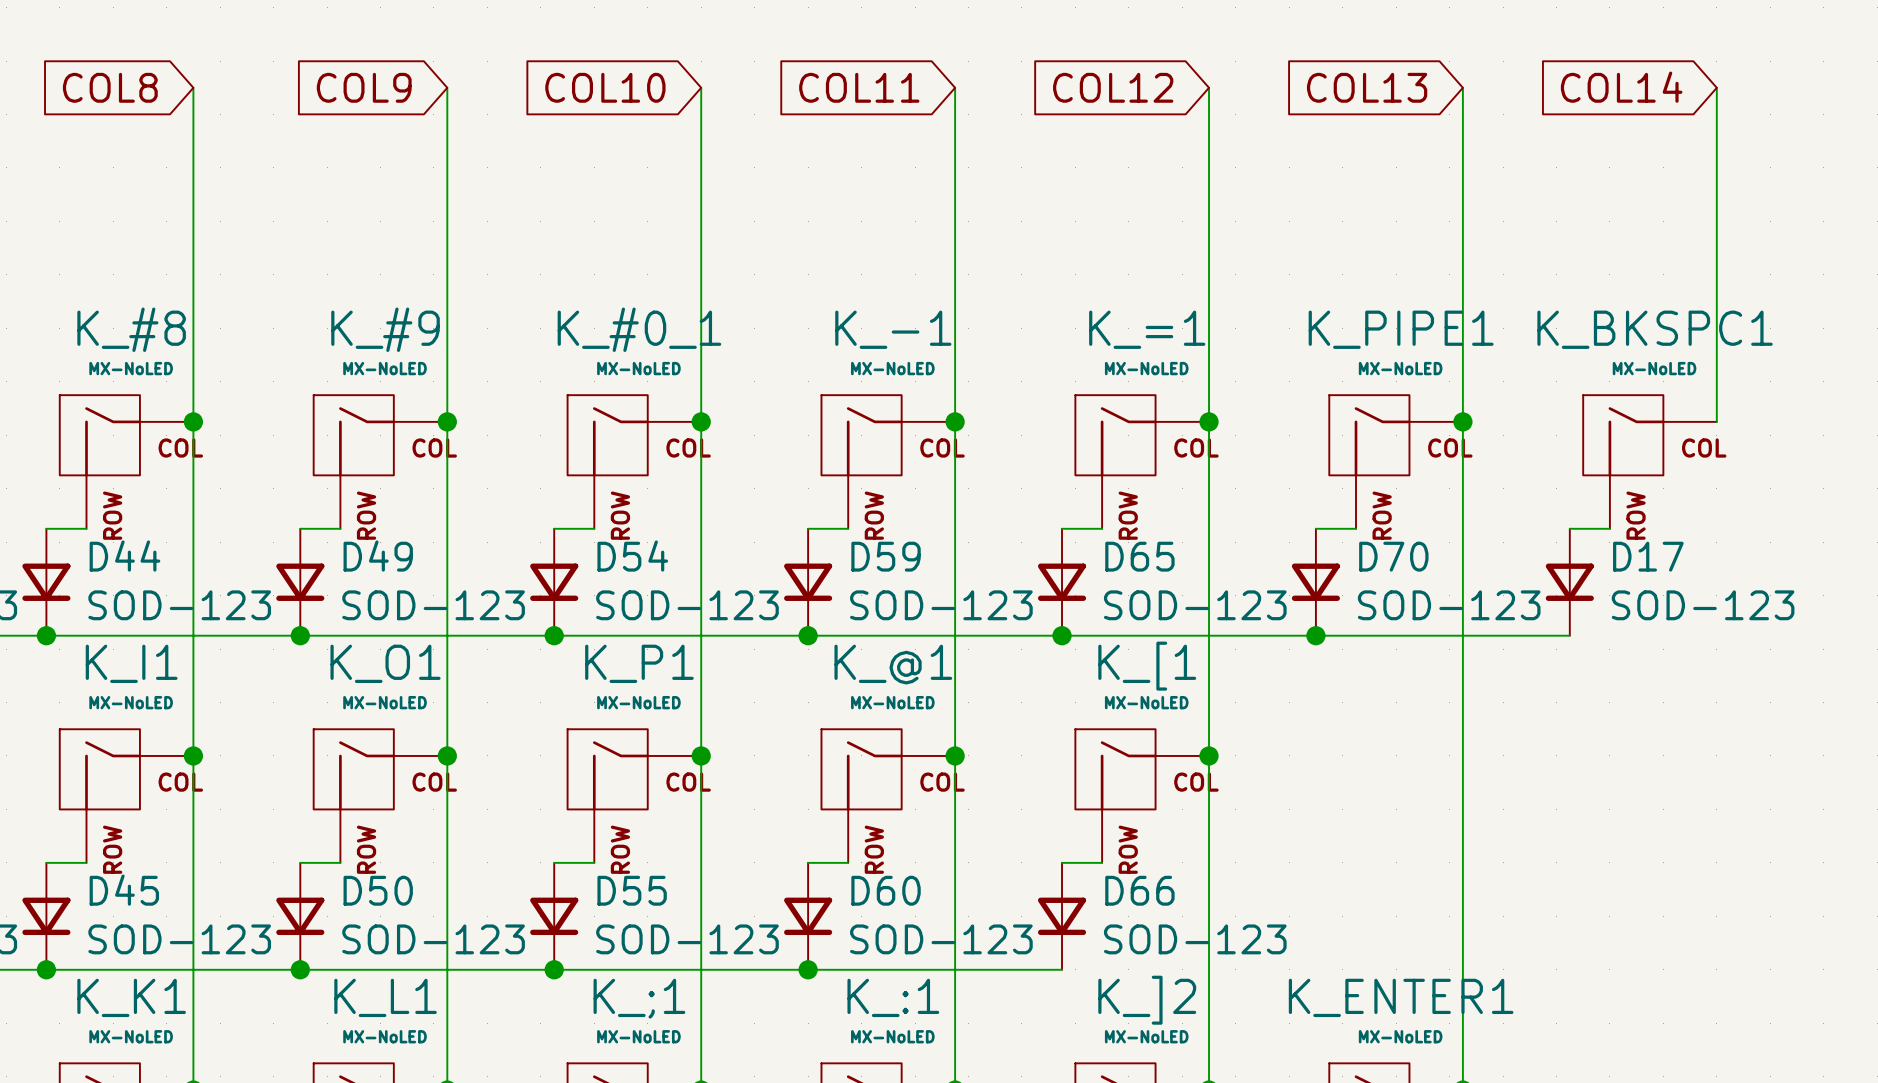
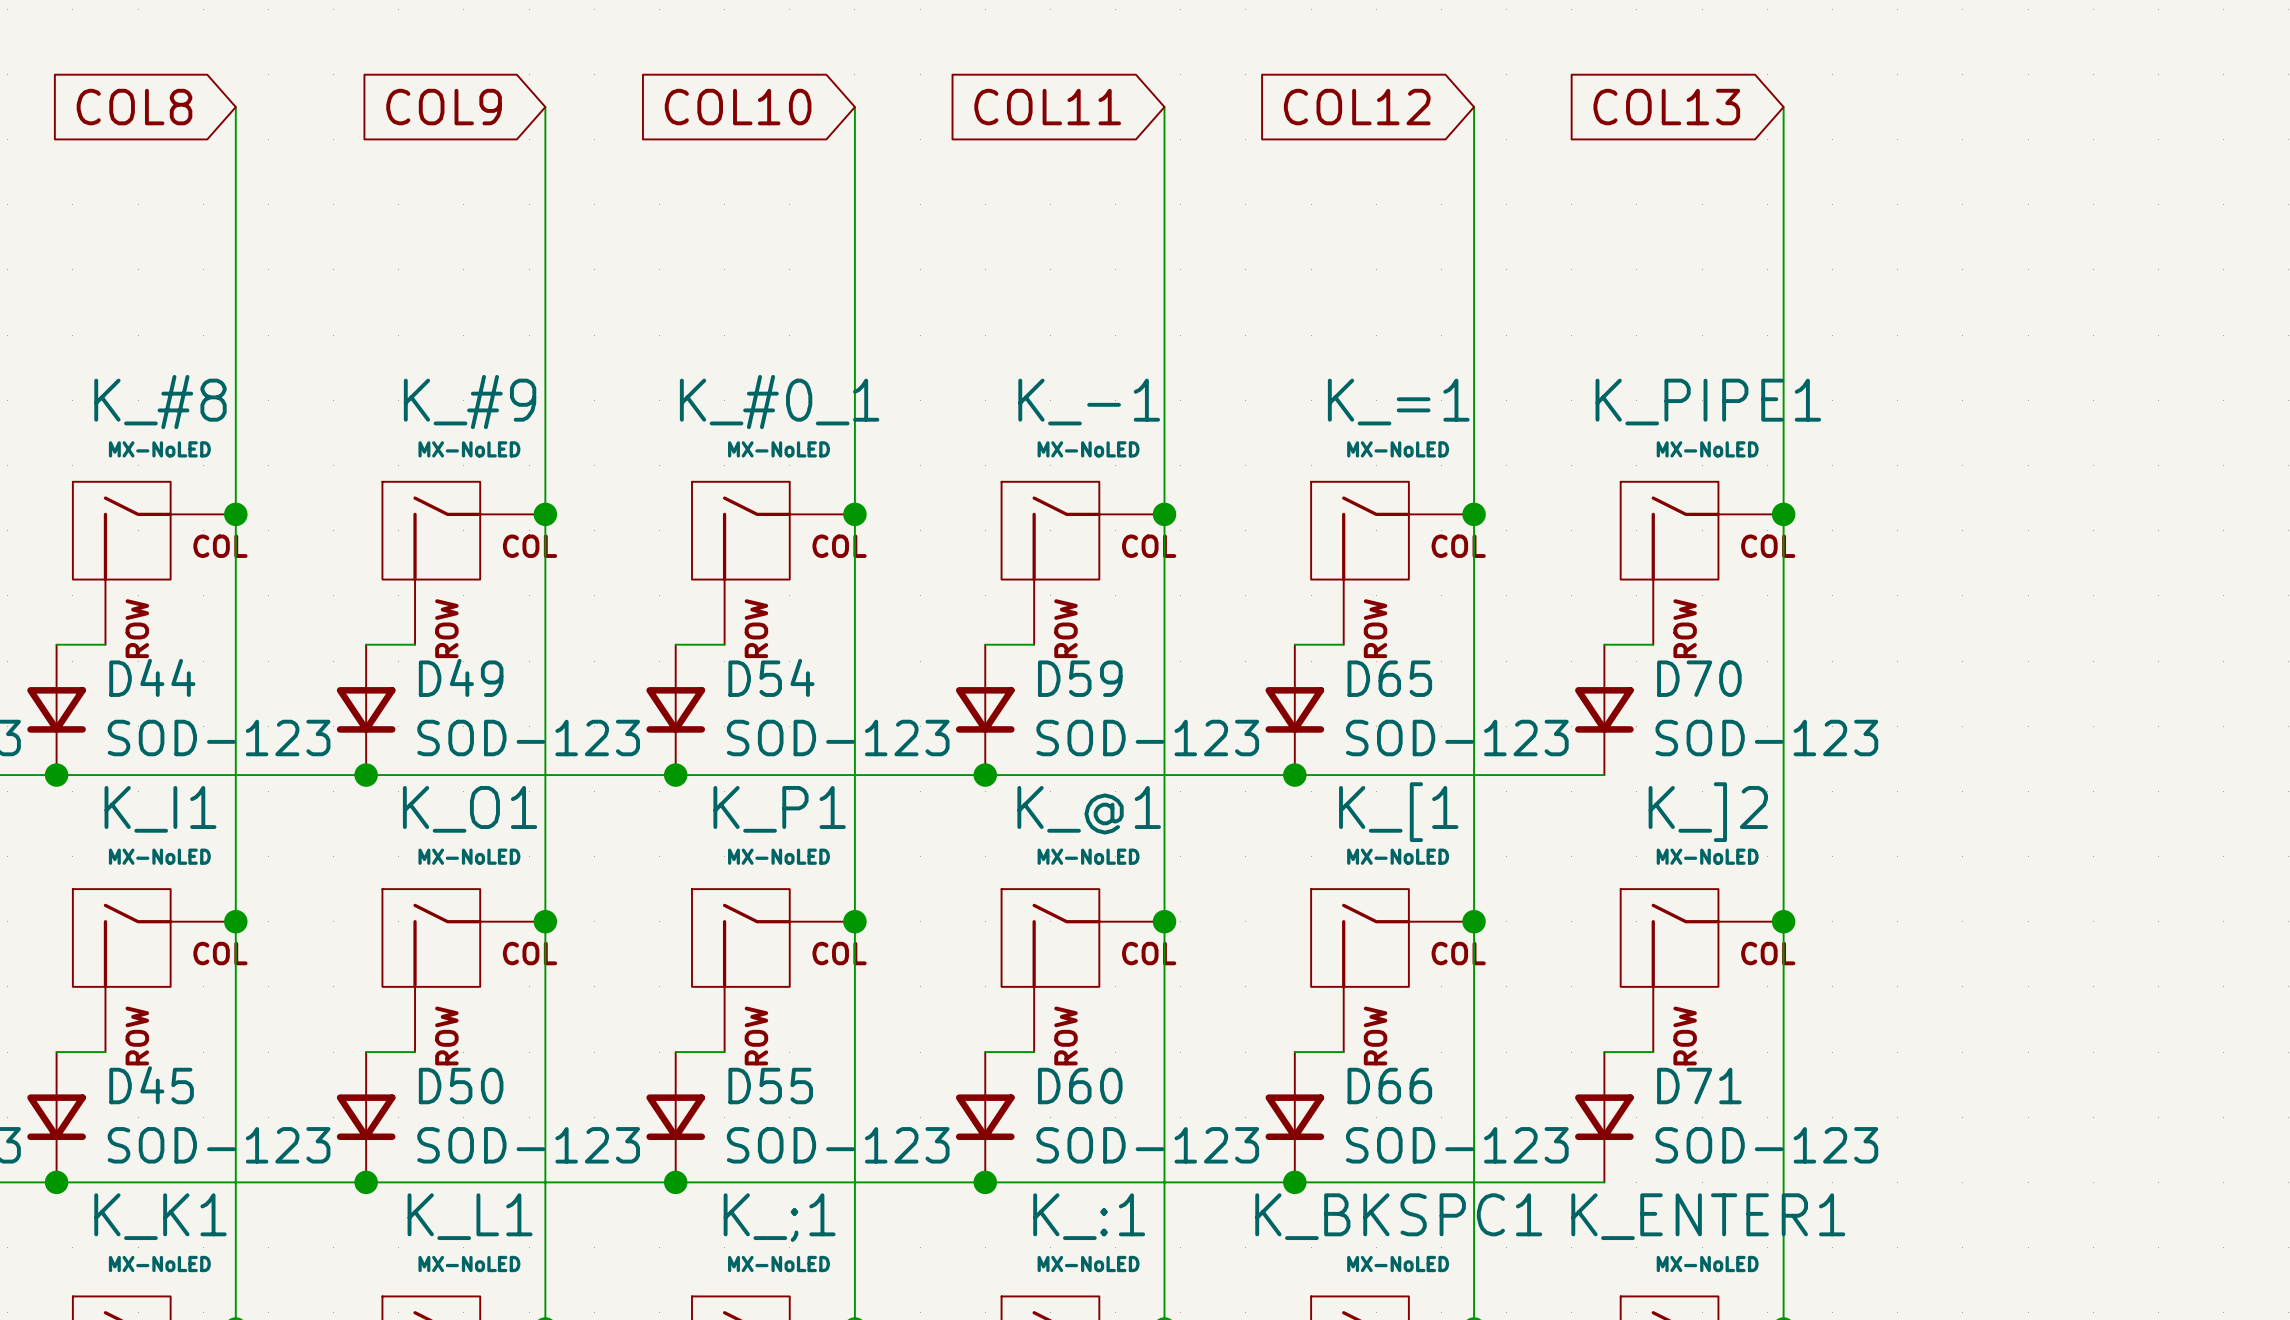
global label: COL14 (1621, 87) -> none
wire: (1716, 87) (1716, 421) -> none
K_BKSPC1: MX-NoLED (1650, 461) -> none
wire: (1569, 528) (1609, 528) -> (1604, 1052) (1653, 1052)
D17: SOD-123 (1569, 582) -> none
wire: (1315, 635) (1569, 635) -> (1294, 1182) (1604, 1182)
junction: (1315, 635) -> none
junction: none -> (1783, 921)
K_]2: none -> MX-NoLED (1702, 970)
D71: none -> SOD-123 (1604, 1117)
junction: none -> (1294, 1182)
K_]2 name: K_]2 (1147, 1000) -> K_BKSPC1 (1398, 1216)

